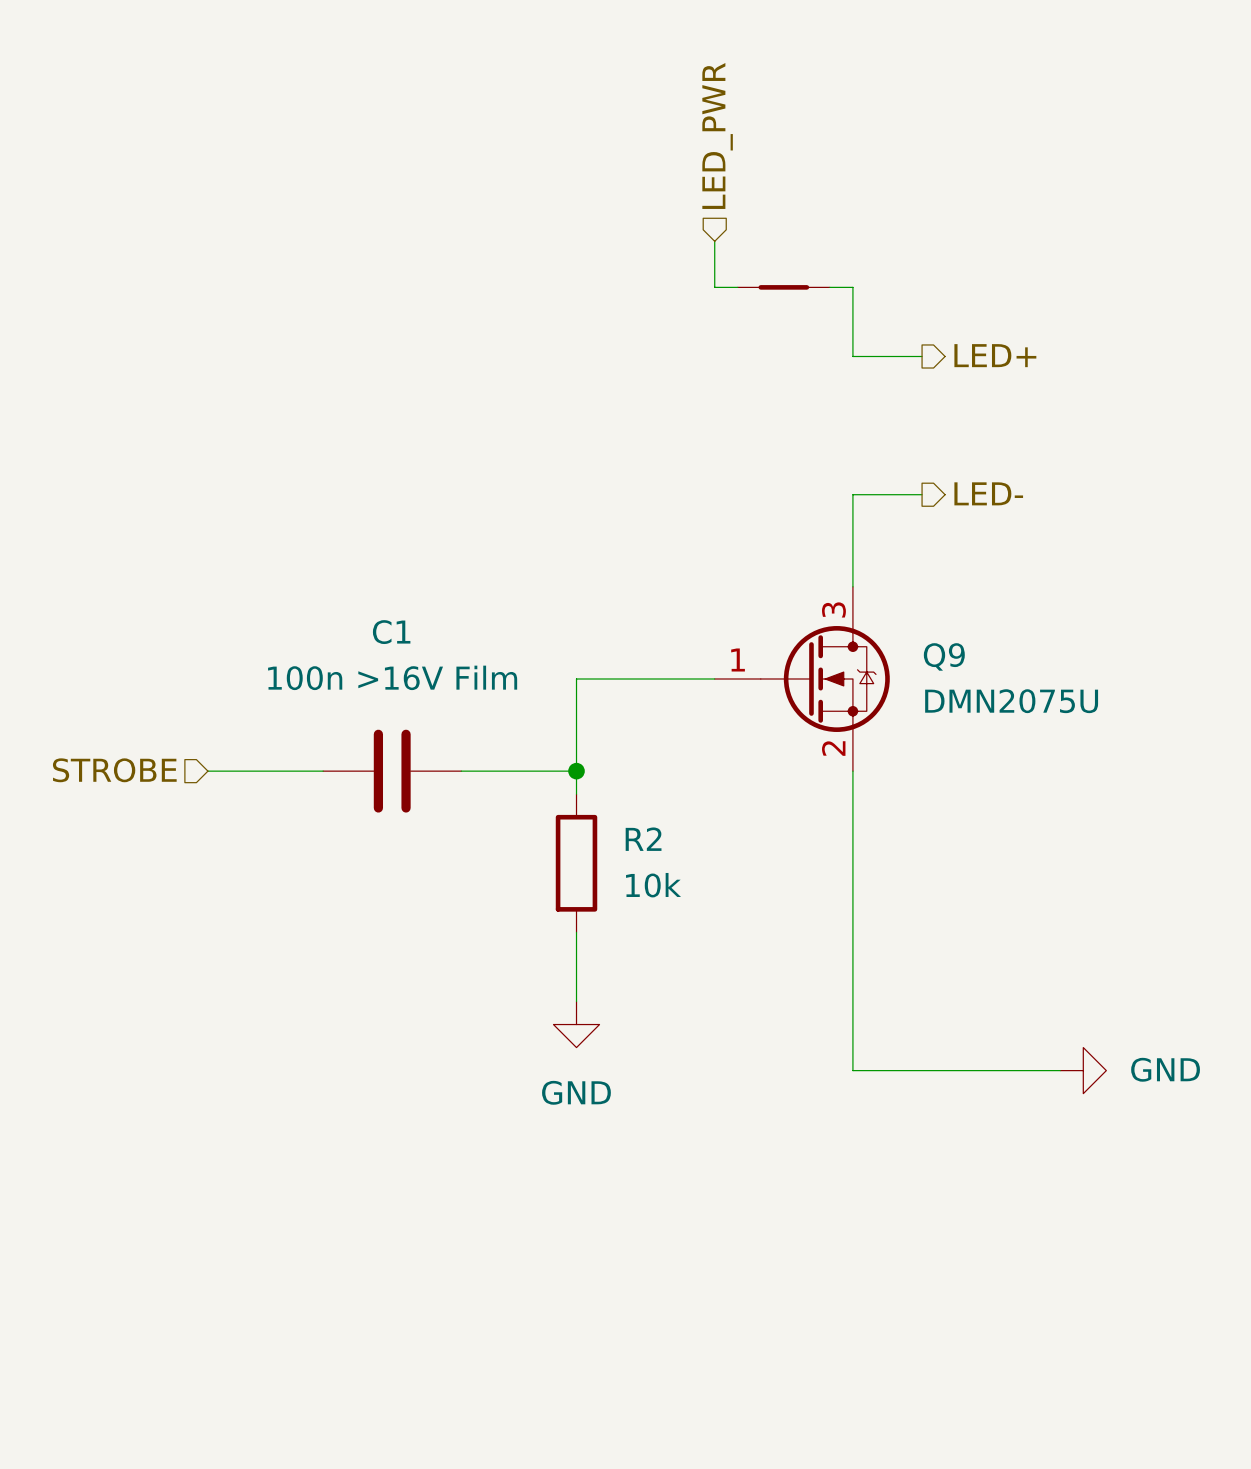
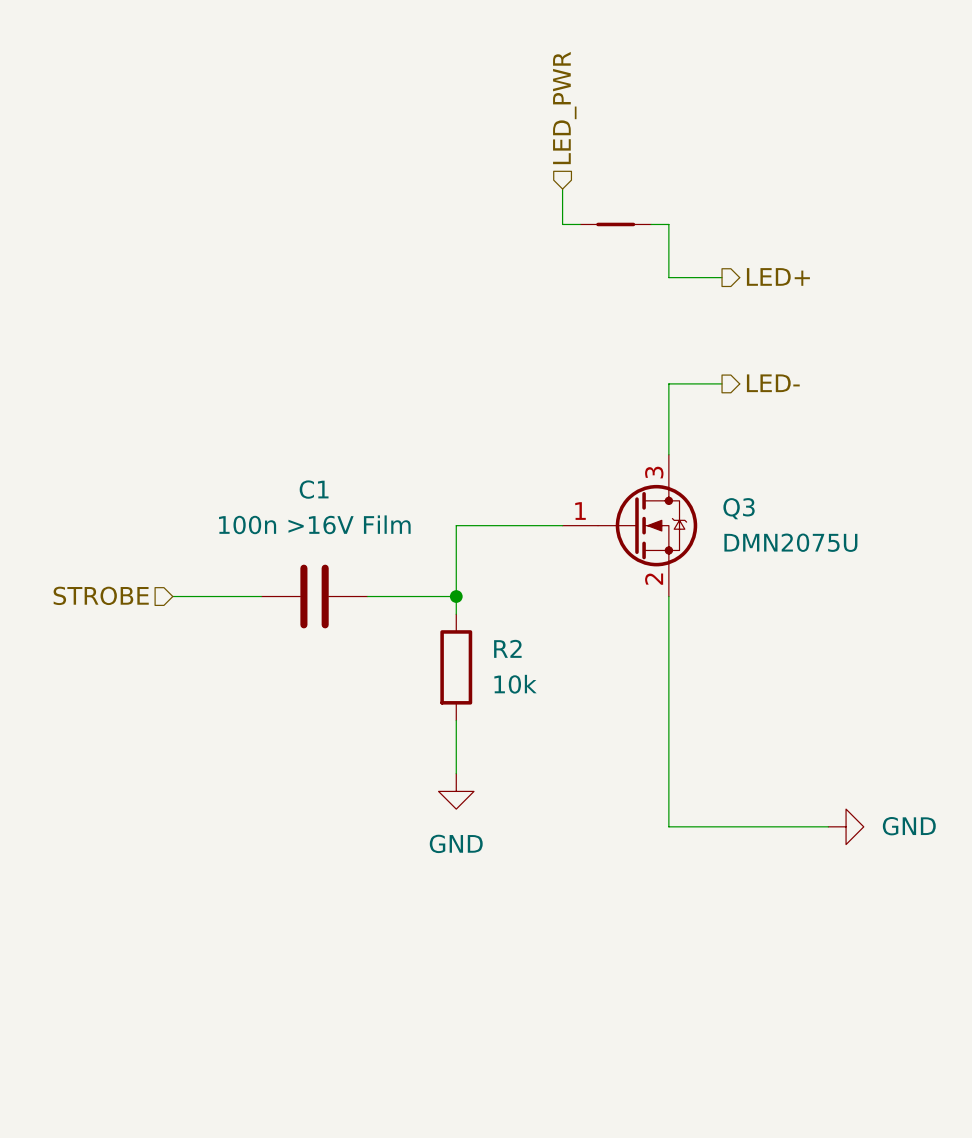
Q9 name: Q9 (944, 656) -> Q3 (739, 508)

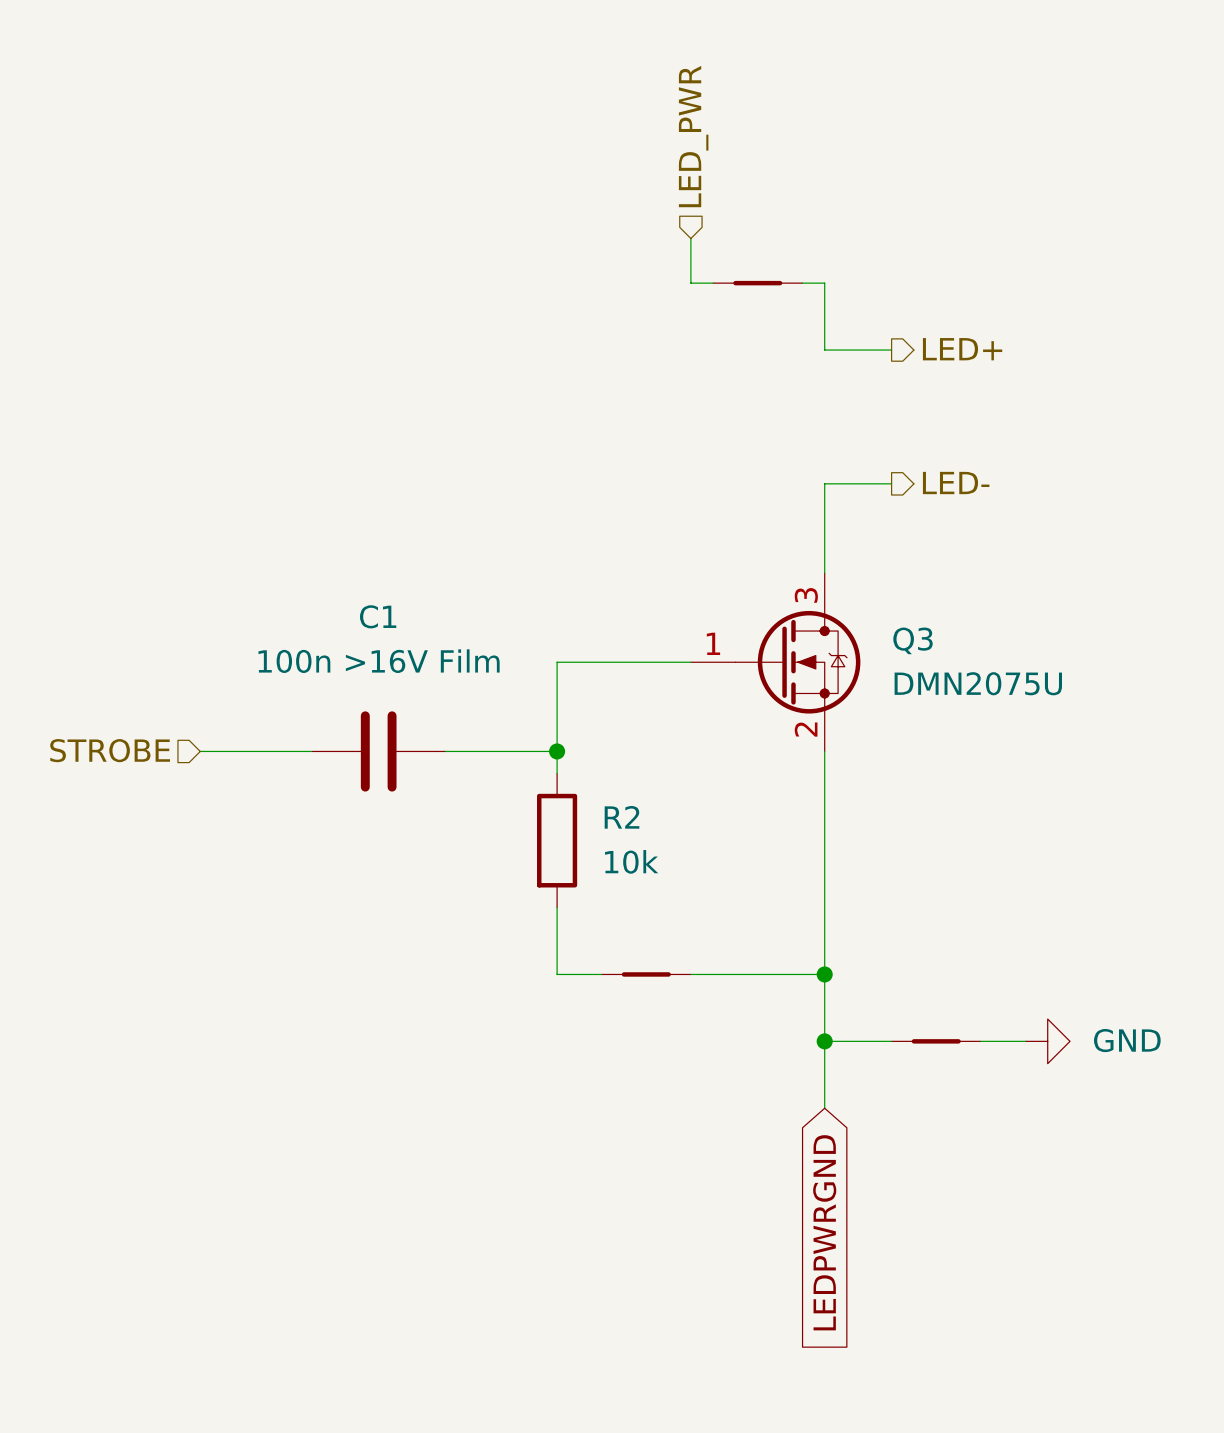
wire: none -> (557, 974) (601, 974)
part: none -> (646, 974)
wire: none -> (690, 974) (824, 974)
junction: none -> (824, 974)
power symbol: GND (456, 791) -> none
wire: none -> (824, 1041) (824, 1108)
junction: none -> (824, 1041)
part: none -> (936, 1041)
global label: none -> LEDPWRGND (824, 1232)

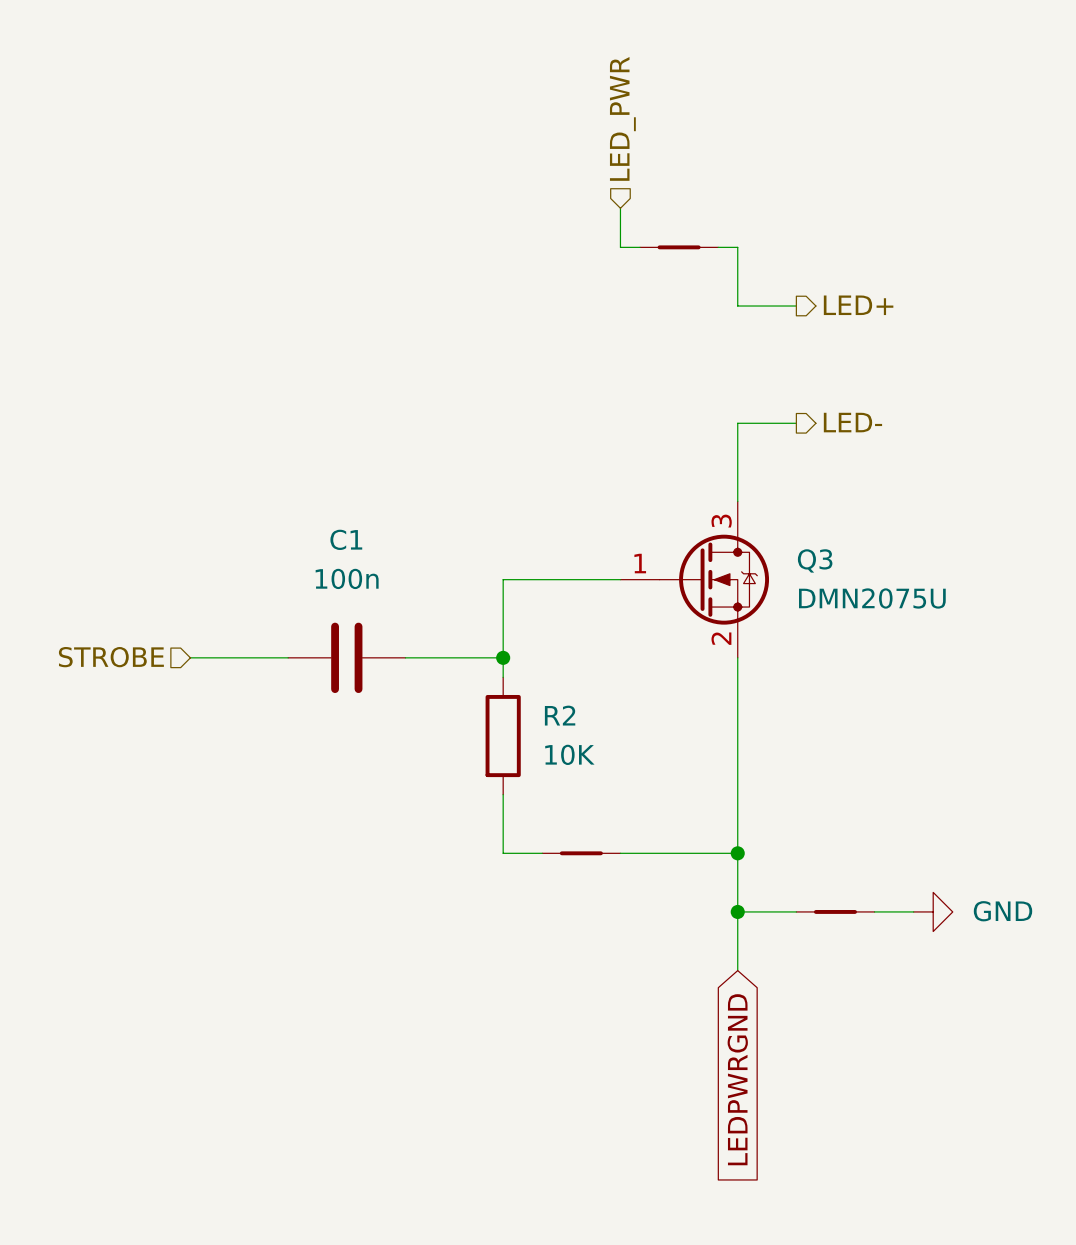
C1 value: 100n >16V Film (379, 661) -> 100n (347, 578)
R2 value: 10k (631, 861) -> 10K (569, 754)

